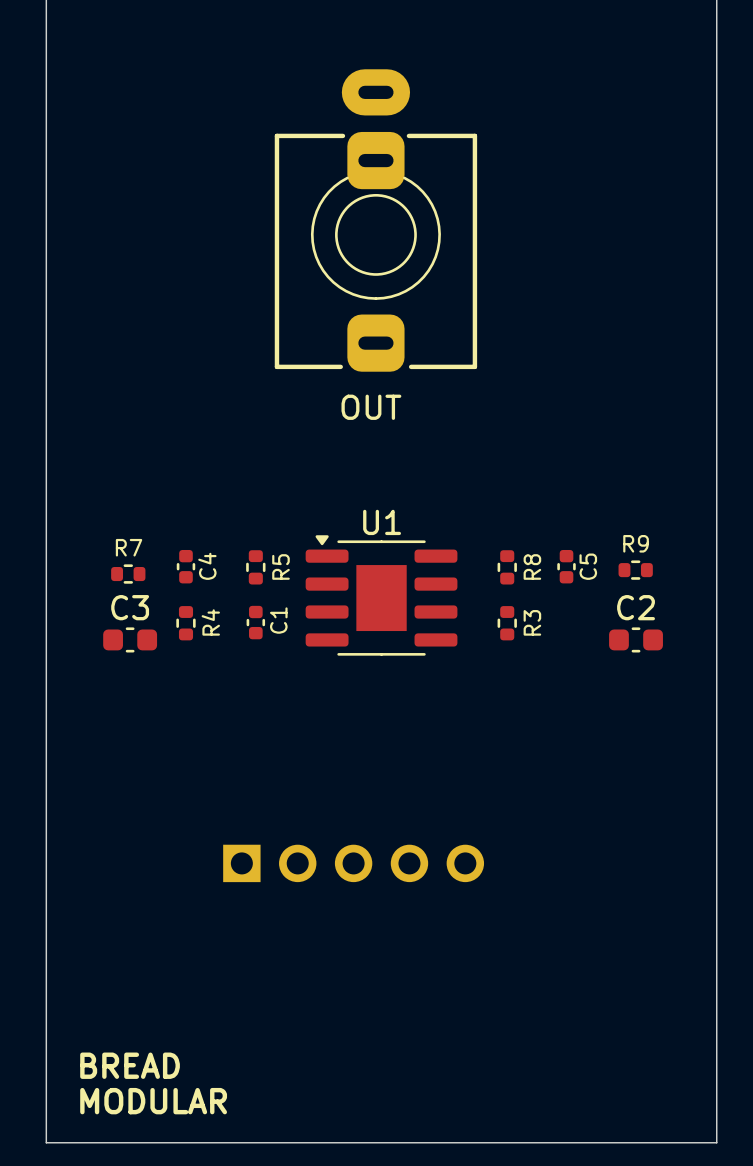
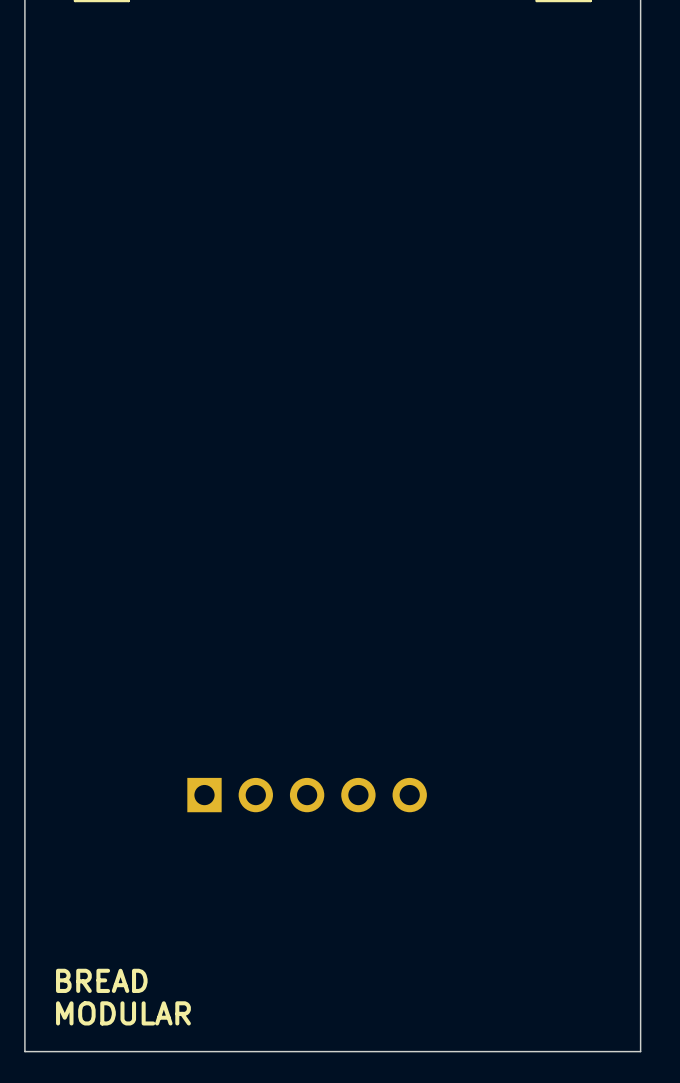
OUT: (375, 220) -> none
C4: (185, 566) -> none
C5: (566, 566) -> none
R5: (255, 567) -> none
R8: (507, 567) -> none
R9: (635, 570) -> none
R7: (128, 574) -> none
U1: (381, 595) -> none
C1: (255, 622) -> none
R4: (185, 623) -> none
R3: (507, 623) -> none
C3: (130, 639) -> none
C2: (636, 639) -> none

